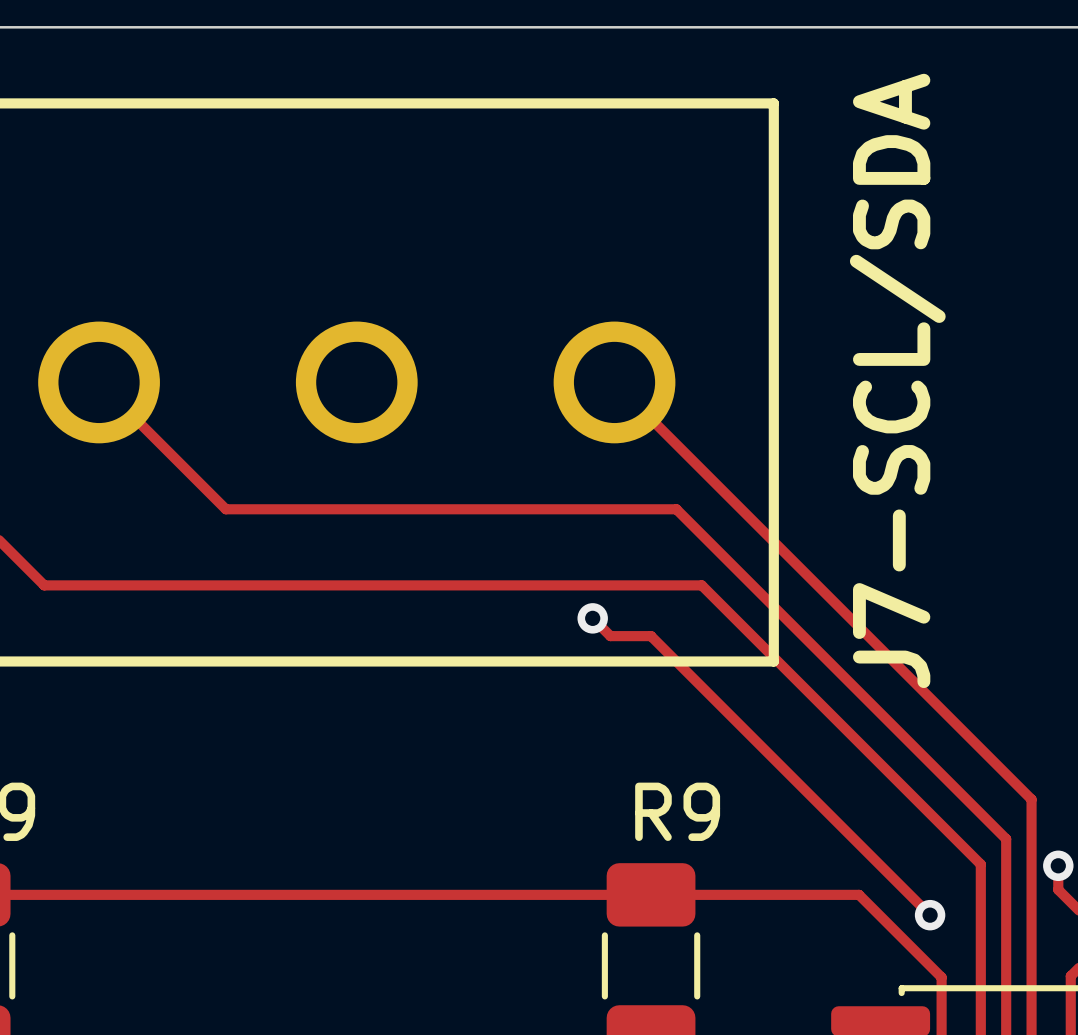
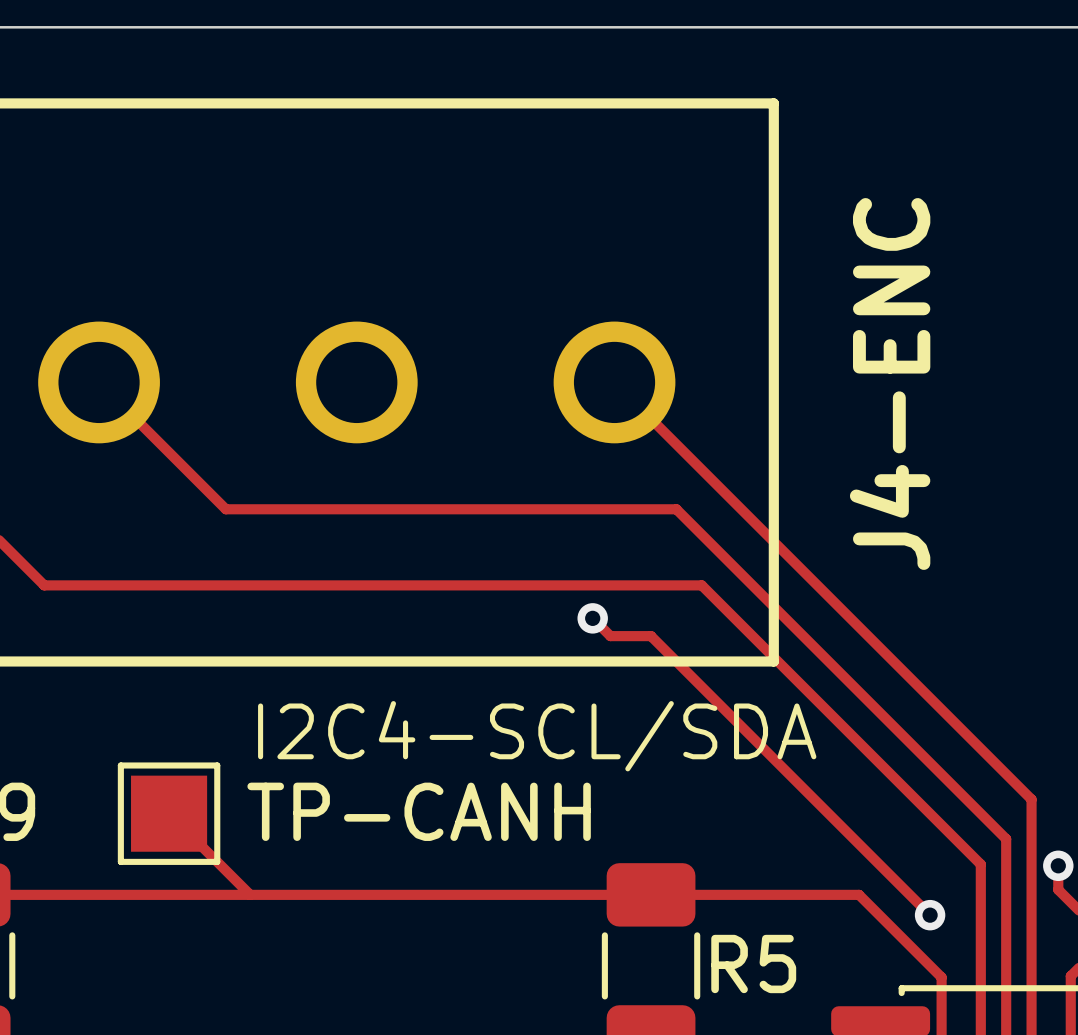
J7-SCL/SDA name: J7-SCL/SDA (897, 380) -> J4-ENC (890, 383)
text: none -> I2C4-SCL/SDA (537, 736)
R9 name: R9 (677, 811) -> R5 (753, 964)
track: none -> (169, 813) (250, 894)
TP-CANH: none -> (169, 813)

